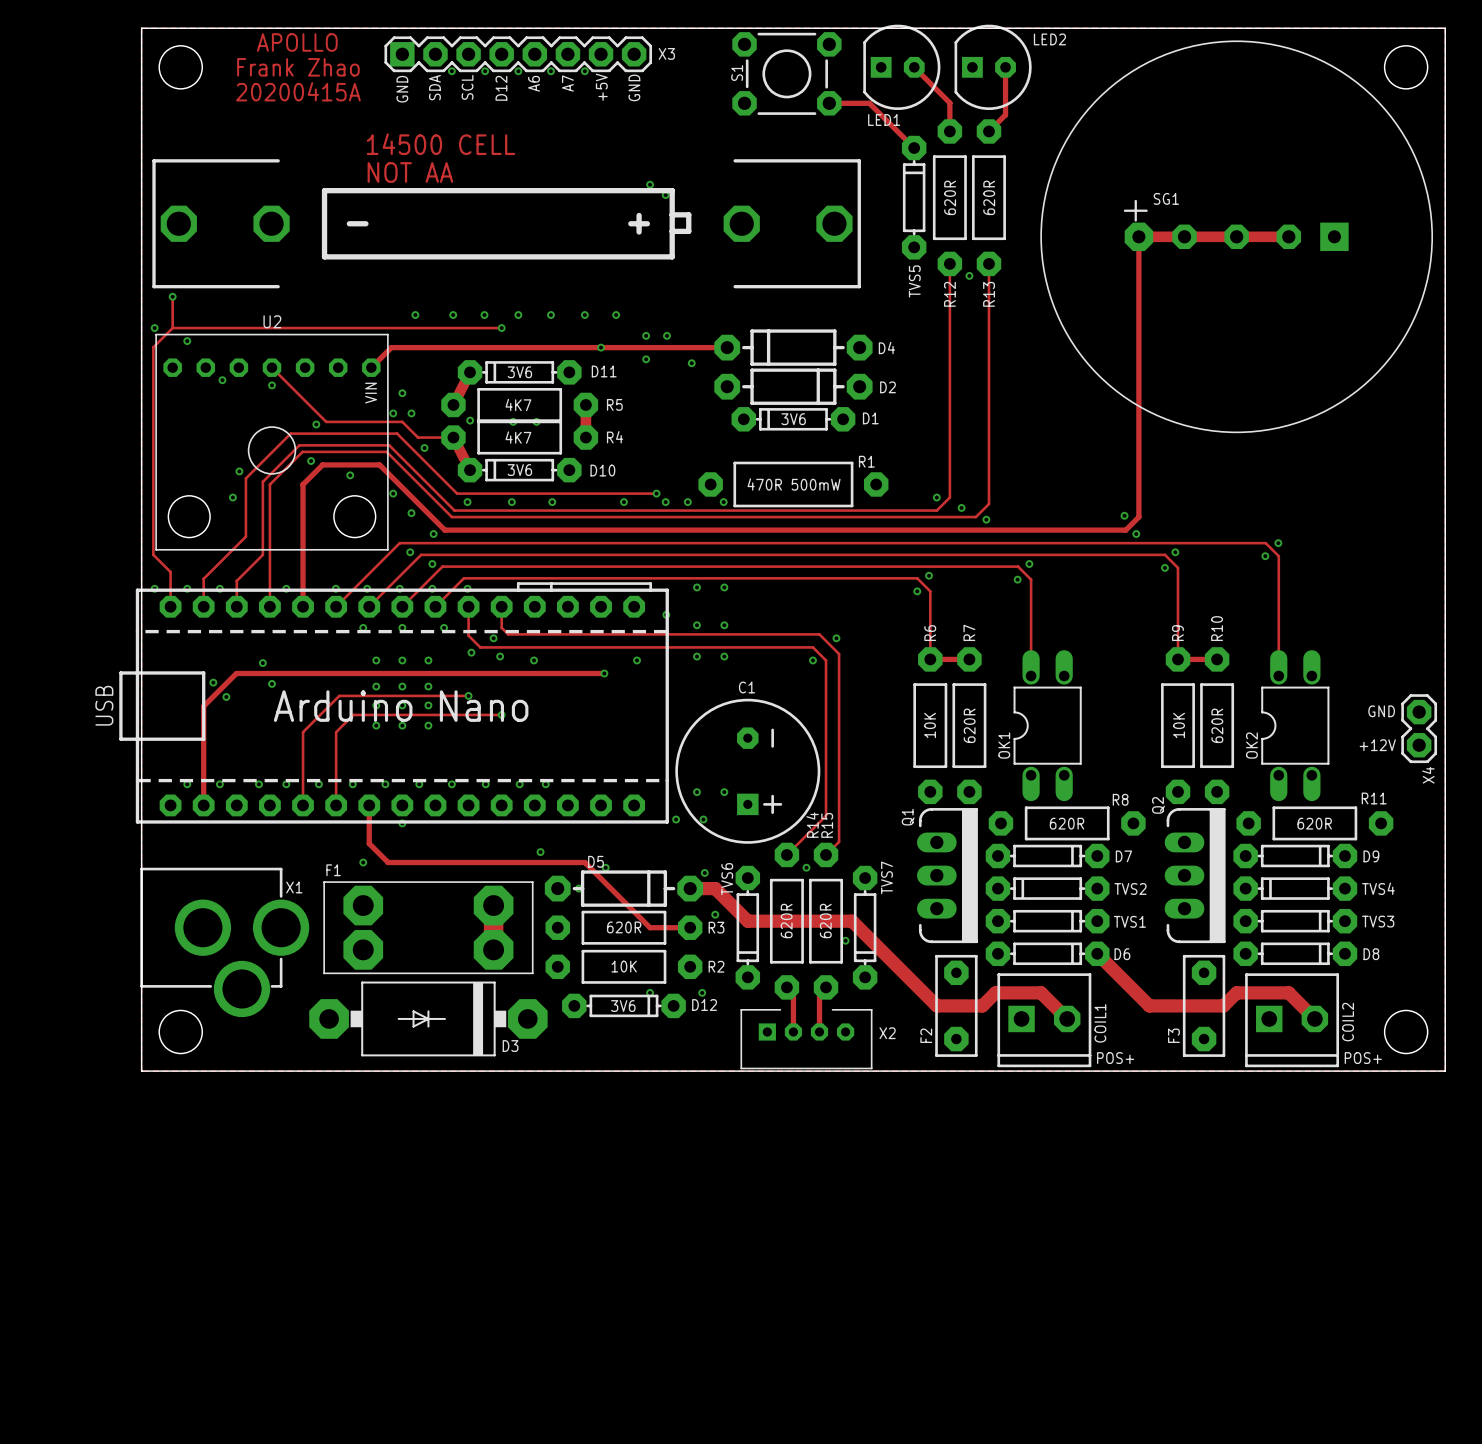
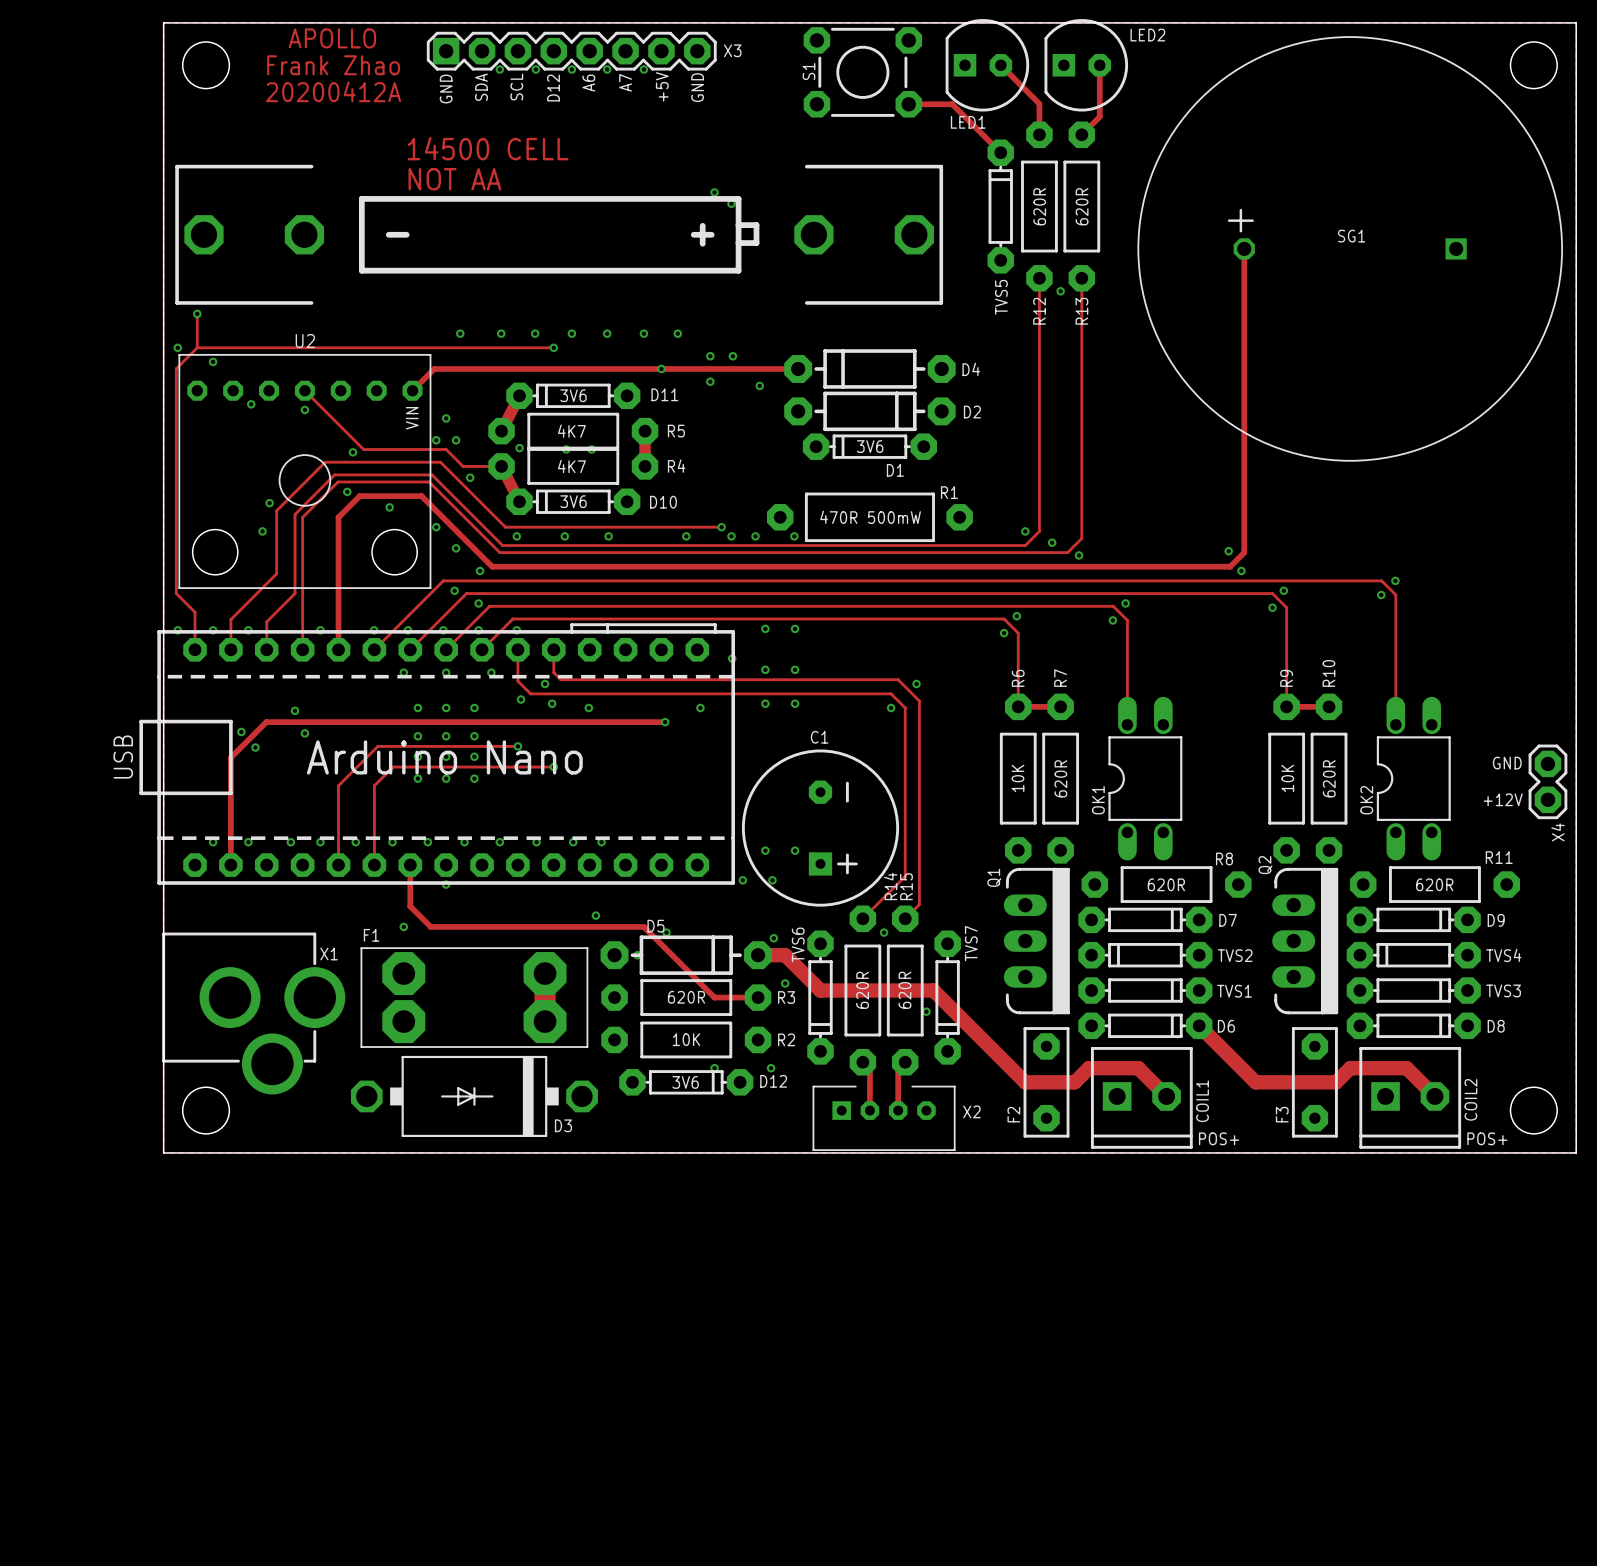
drawing shape: [236, 33, 361, 102] -> [265, 28, 402, 103]
SG1 footprint: [1040, 40, 1434, 434] -> [1137, 36, 1563, 462]
SG1 name position: SG1 (1166, 198) -> SG1 (1351, 236)
track: (1138, 236) (1288, 236) -> none
part: (1184, 236) -> none
part: (1236, 236) -> none
part: (1288, 236) -> none
D1 name position: D1 (870, 418) -> D1 (895, 470)
D3 footprint: [309, 981, 548, 1057] -> [350, 1055, 598, 1138]

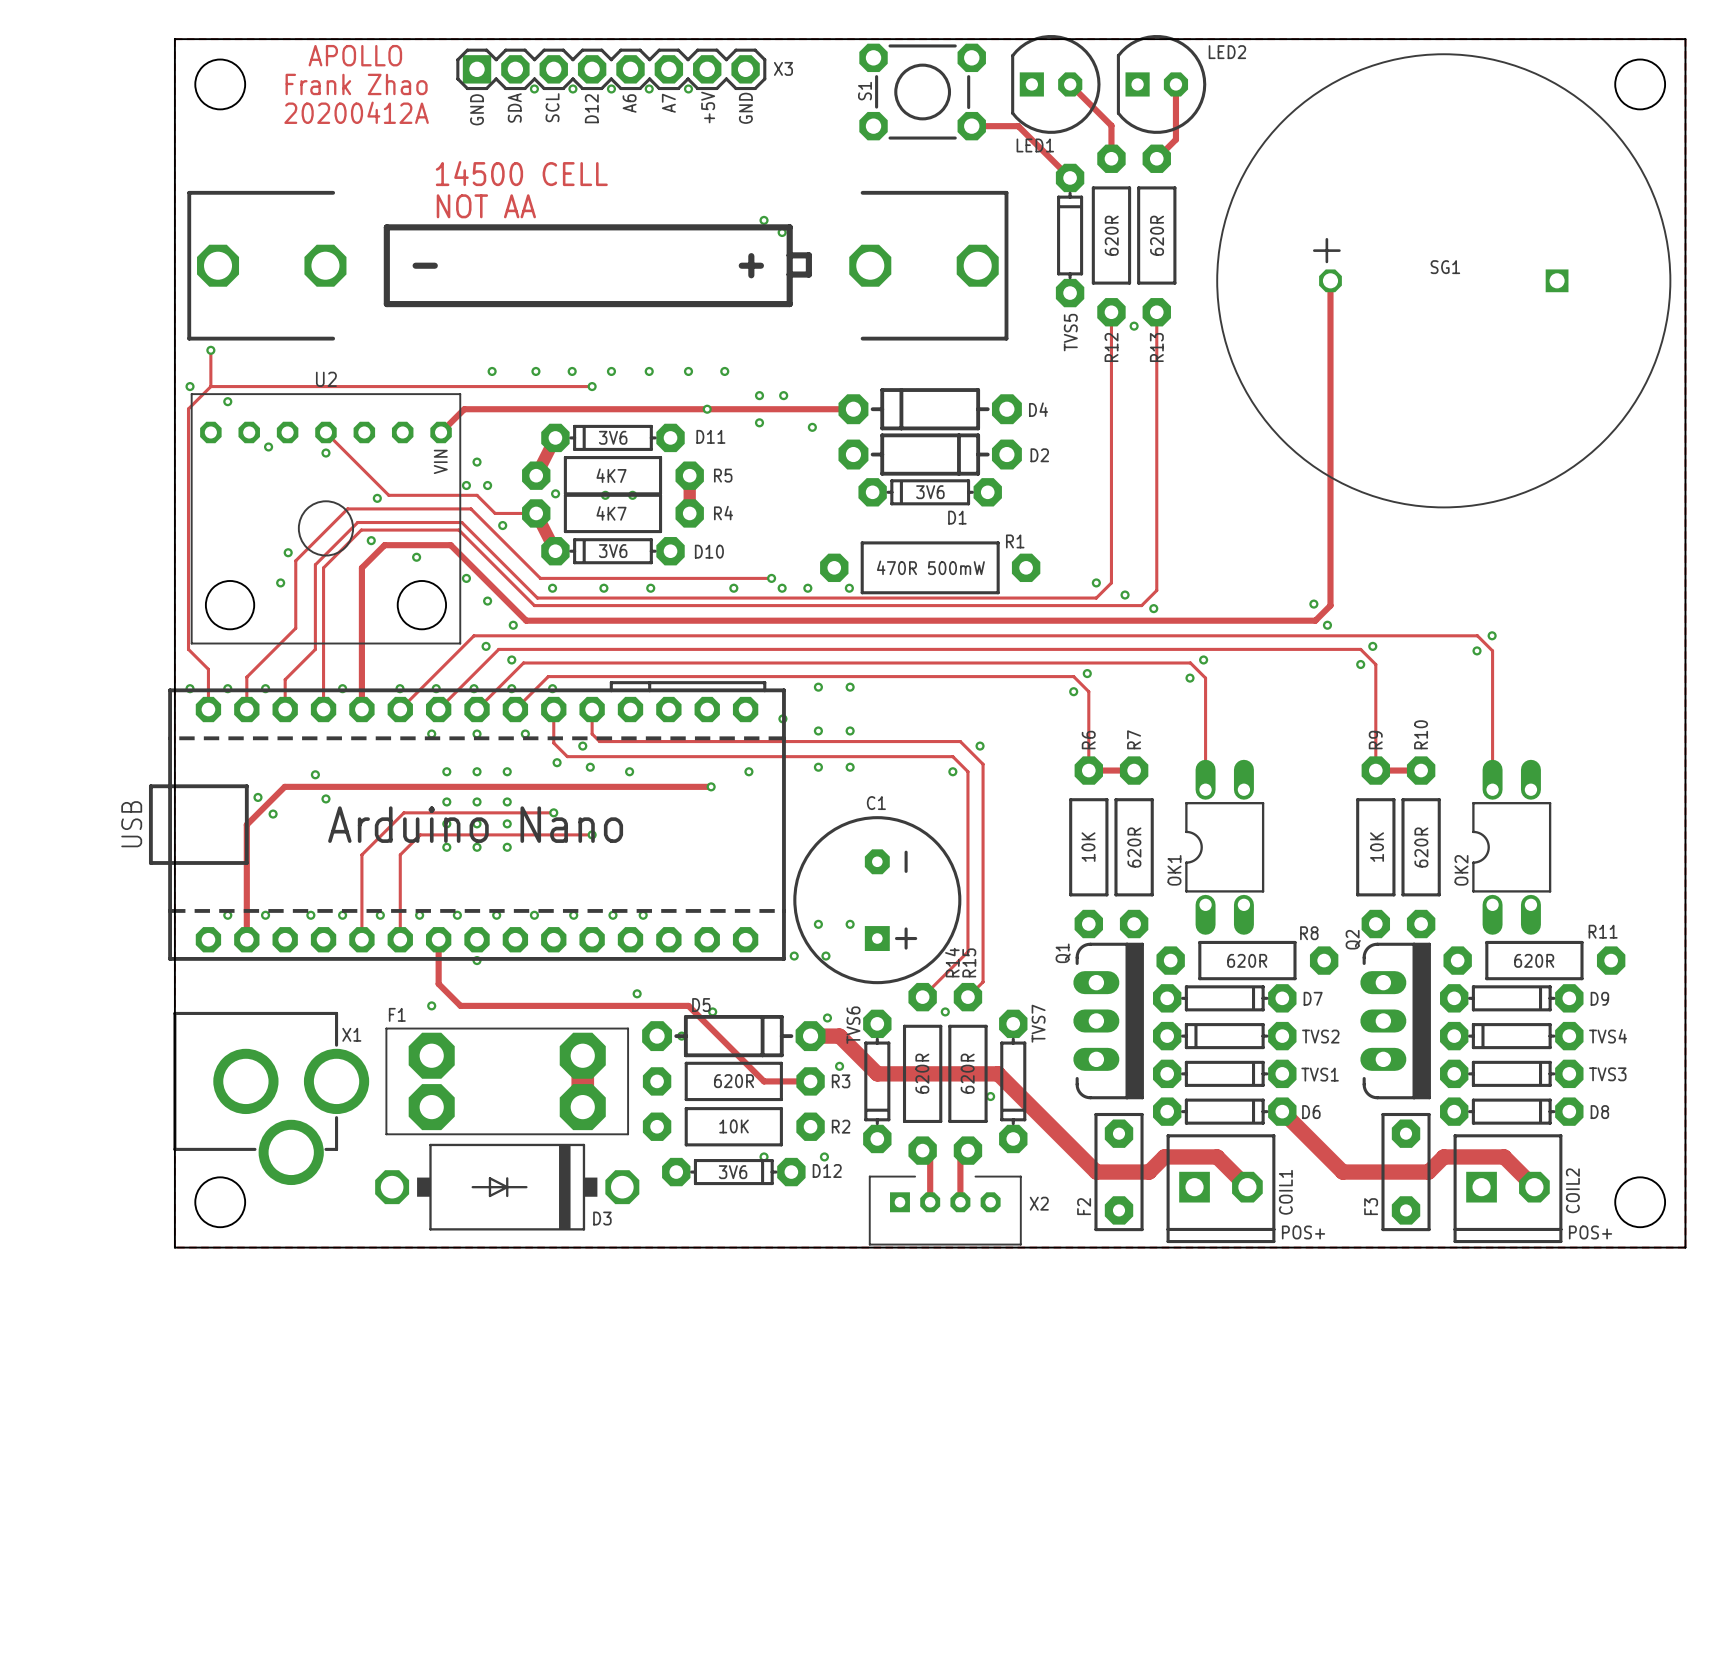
text: GND (1507, 763) -> none
X4: (1547, 781) -> none
text: +12V (1503, 799) -> none

